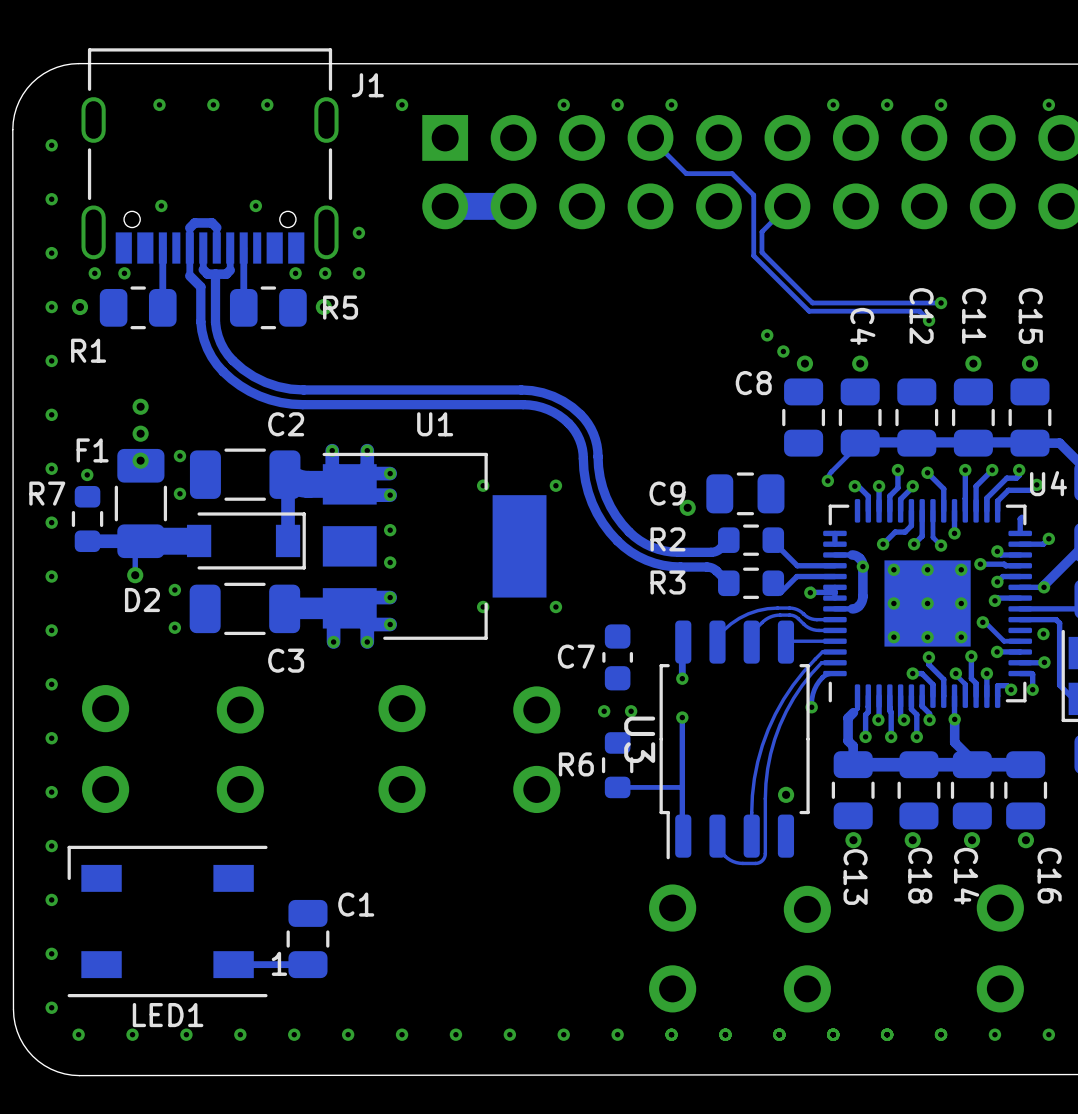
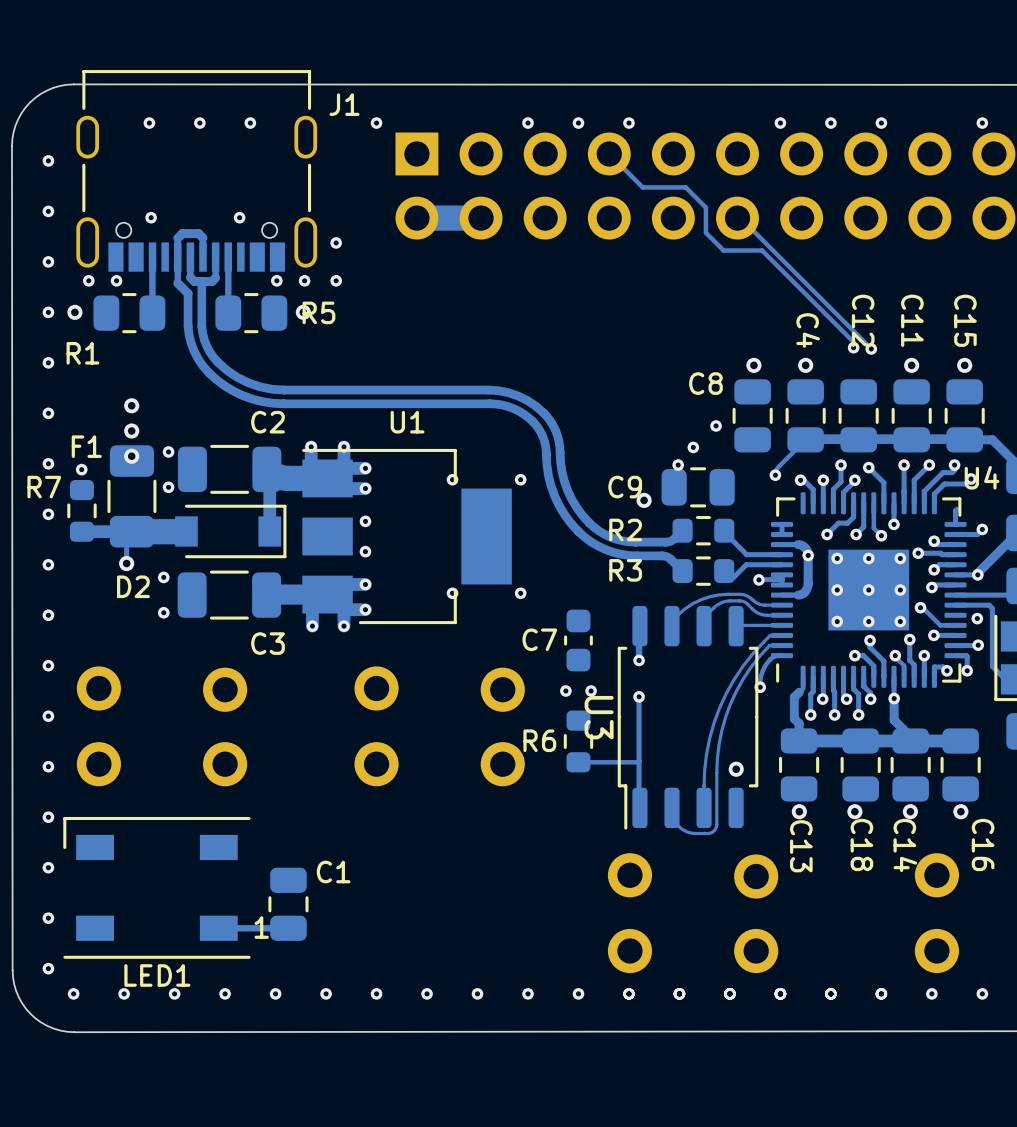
track: (787, 206) (761, 231) (761, 252) (812, 302) (941, 302) -> (737, 218) (740, 218) (871, 348)
track: (753, 222) (753, 255) (809, 311) (919, 311) (929, 320) -> (705, 232) (723, 250) (762, 250) (853, 342) (853, 347)
via: (941, 302) -> none
via: (929, 320) -> none
via: (767, 335) -> none
via: none -> (853, 347)
via: none -> (871, 348)
via: (783, 351) -> none
via: none -> (716, 425)
via: none -> (693, 447)
via: none -> (678, 465)

